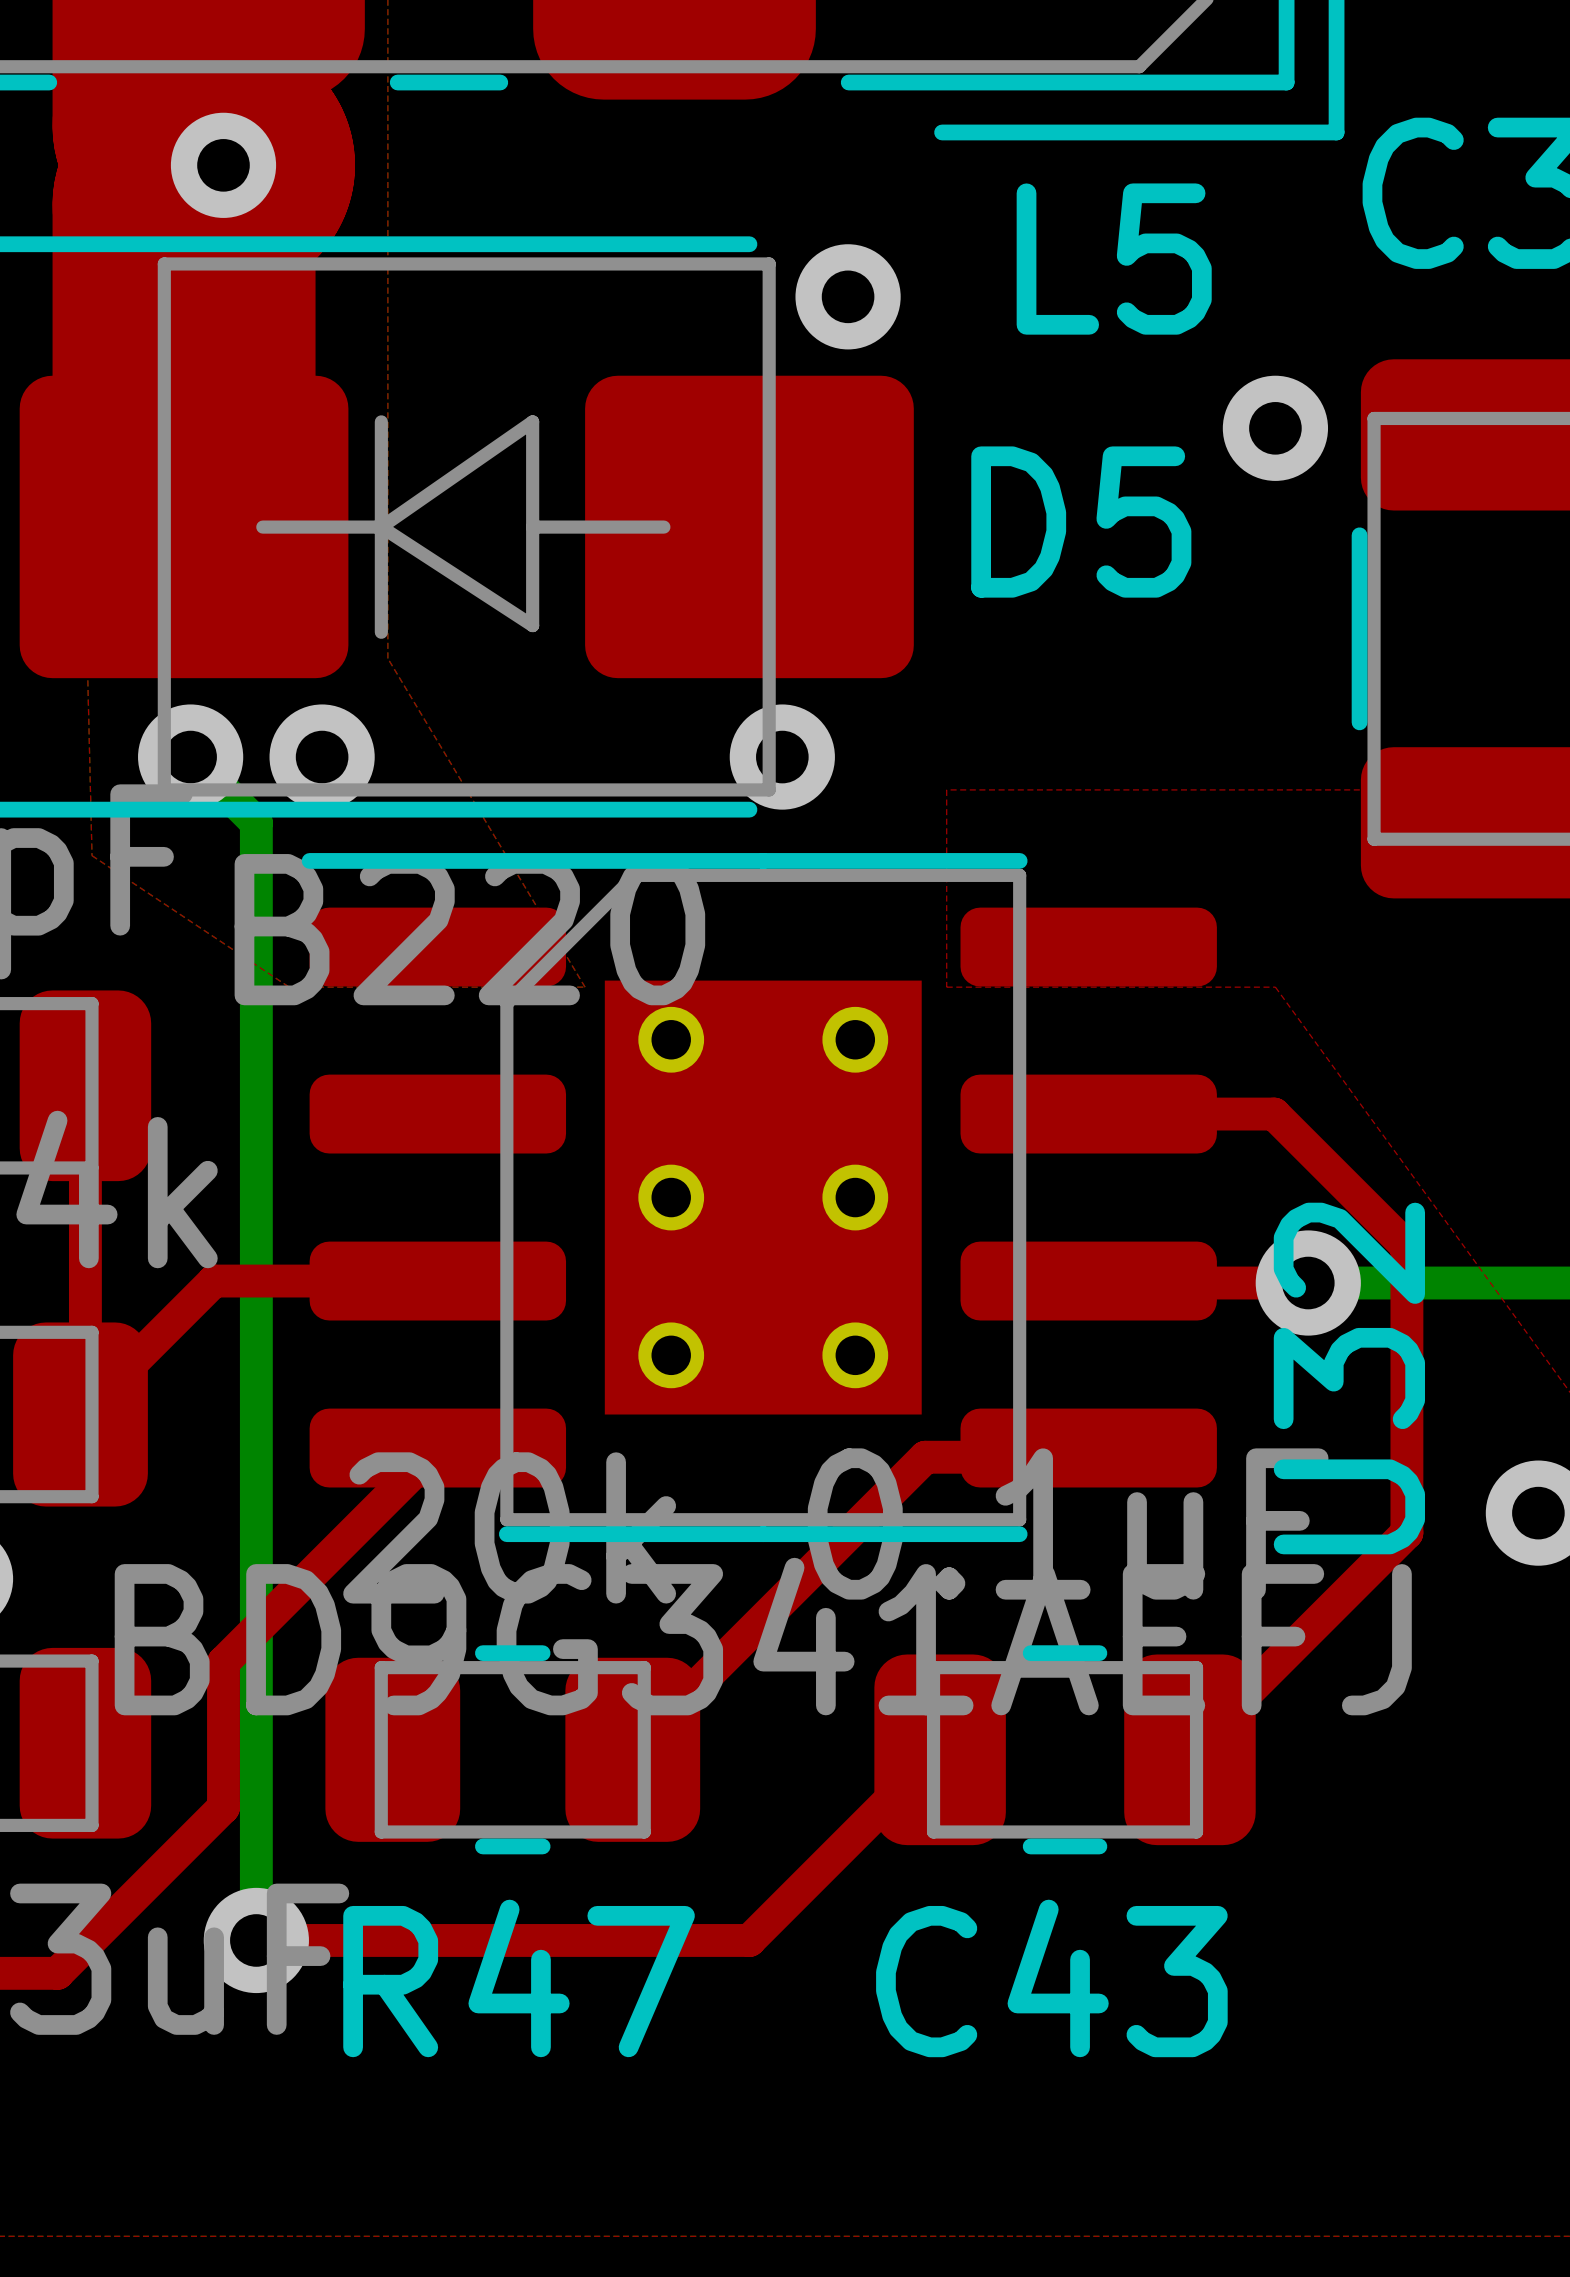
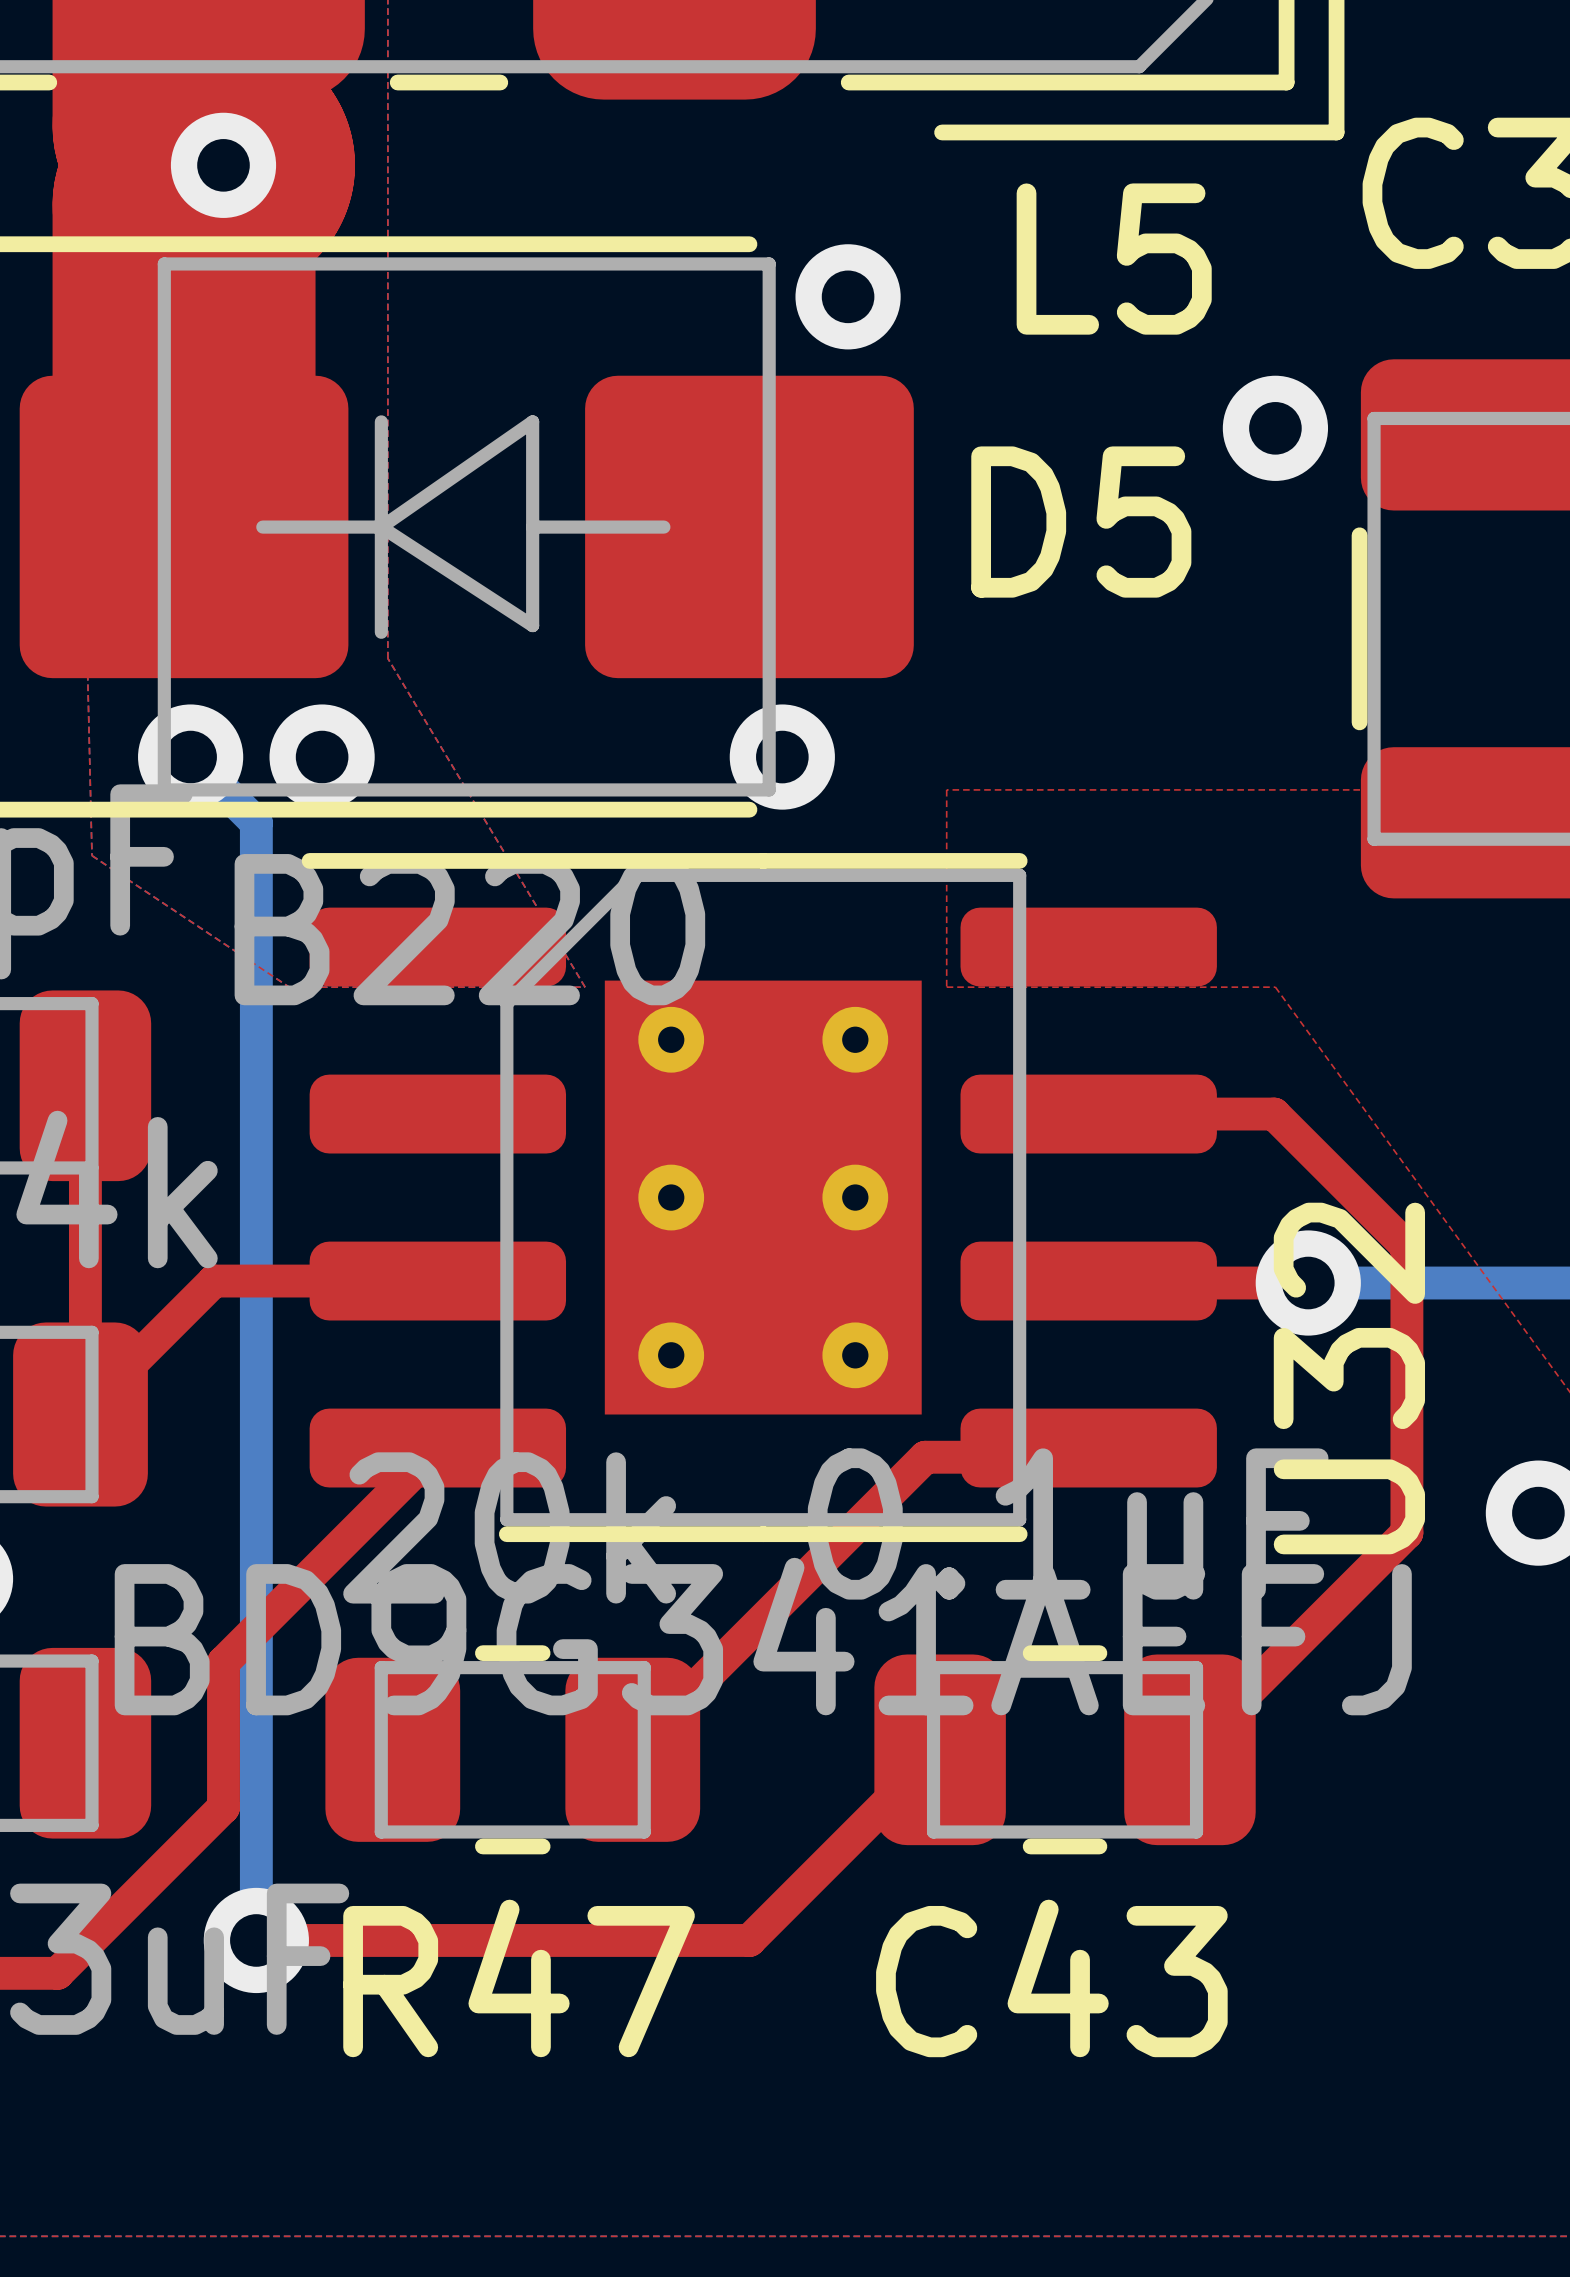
U32 footprint: [301, 853, 1217, 1543] -> [301, 853, 1217, 1543]

